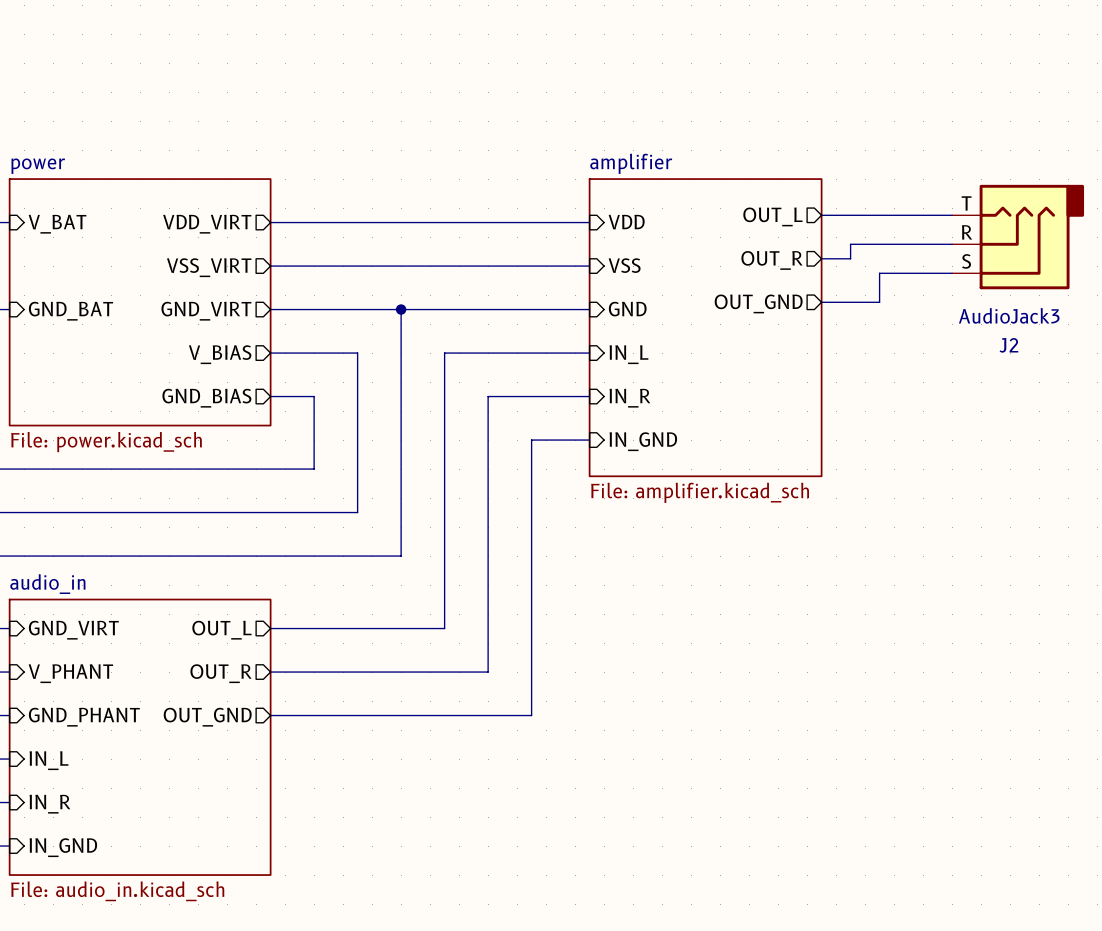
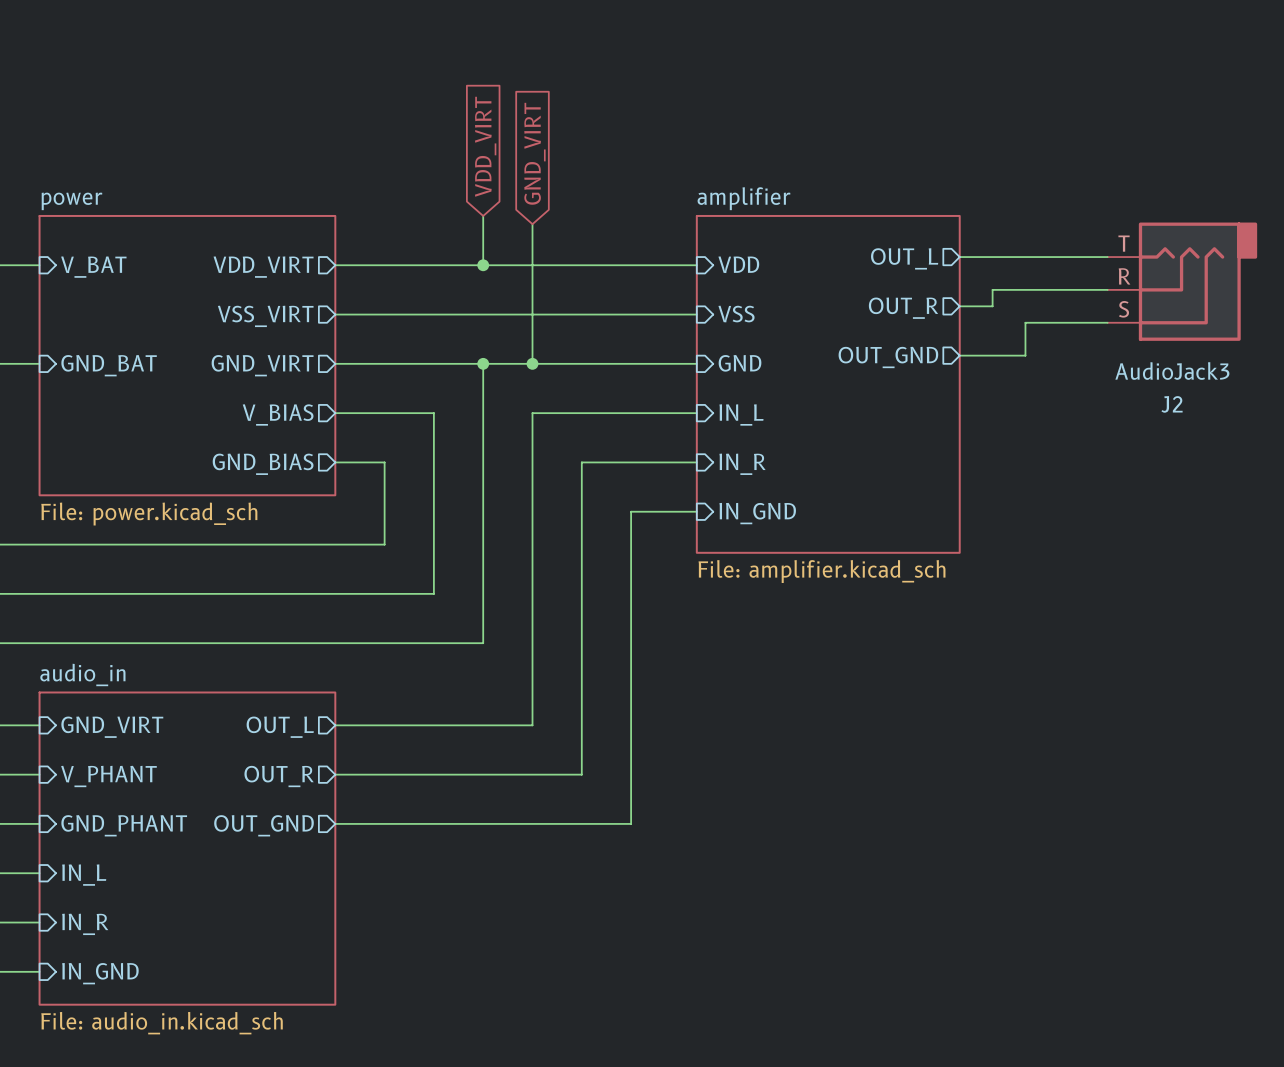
global label: none -> VDD_VIRT (485, 146)
global label: none -> GND_VIRT (534, 153)
wire: none -> (483, 215) (483, 265)
wire: none -> (532, 224) (532, 363)
junction: none -> (483, 265)
junction: none -> (532, 363)

